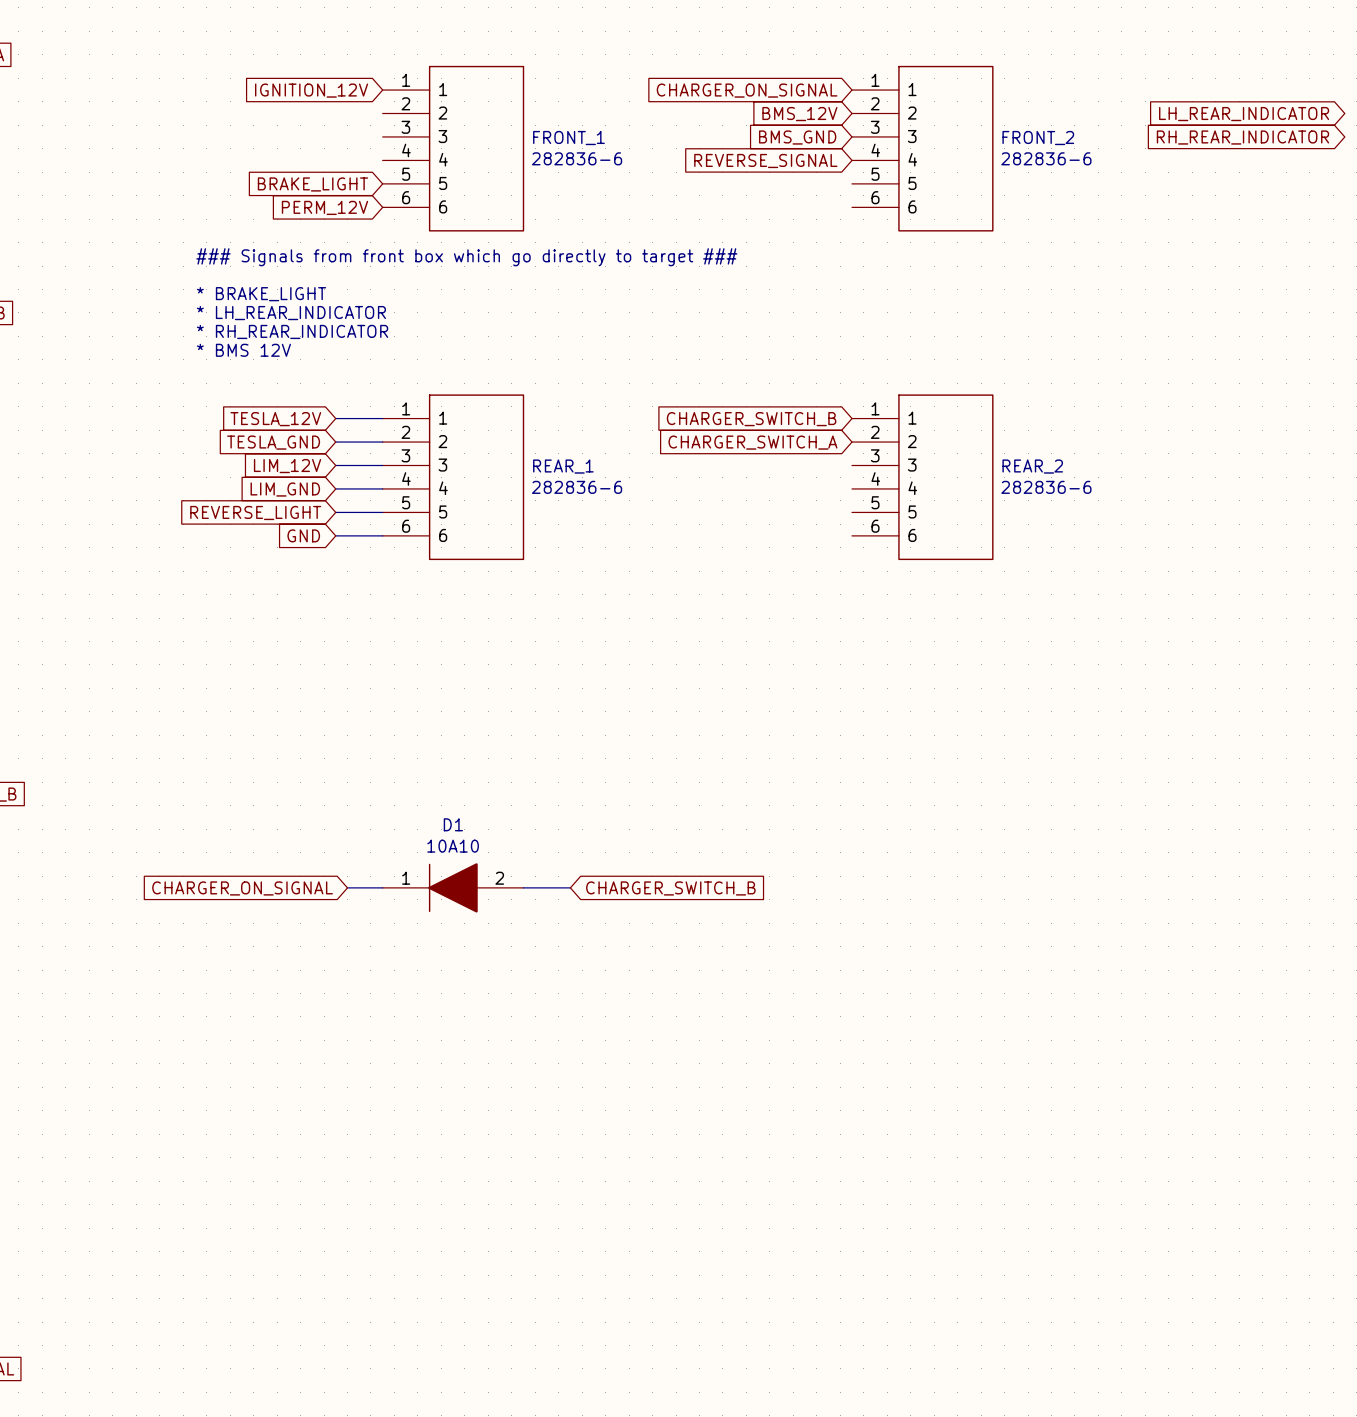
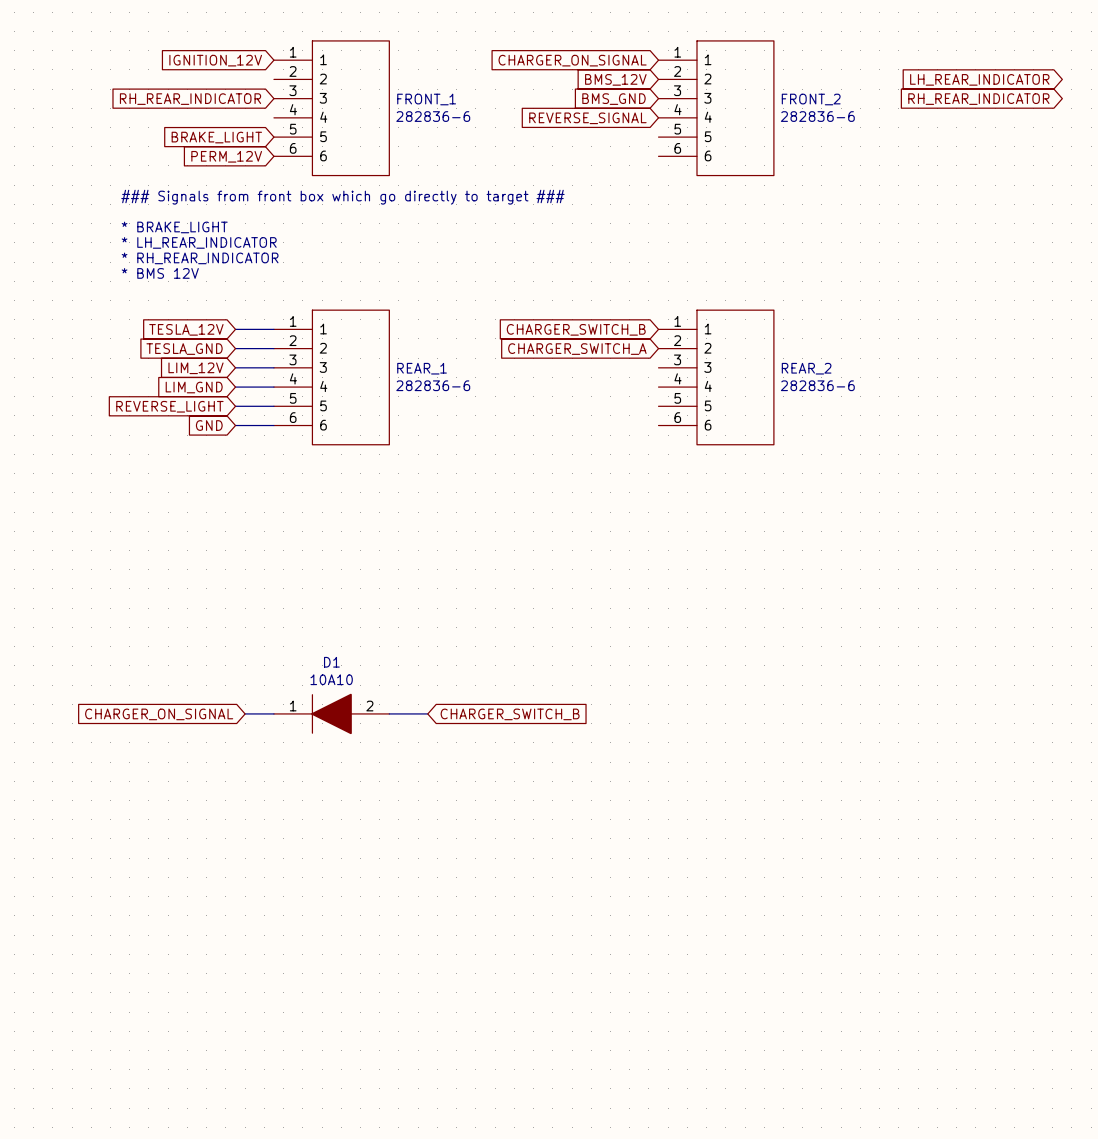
global label: none -> RH_REAR_INDICATOR (190, 99)

